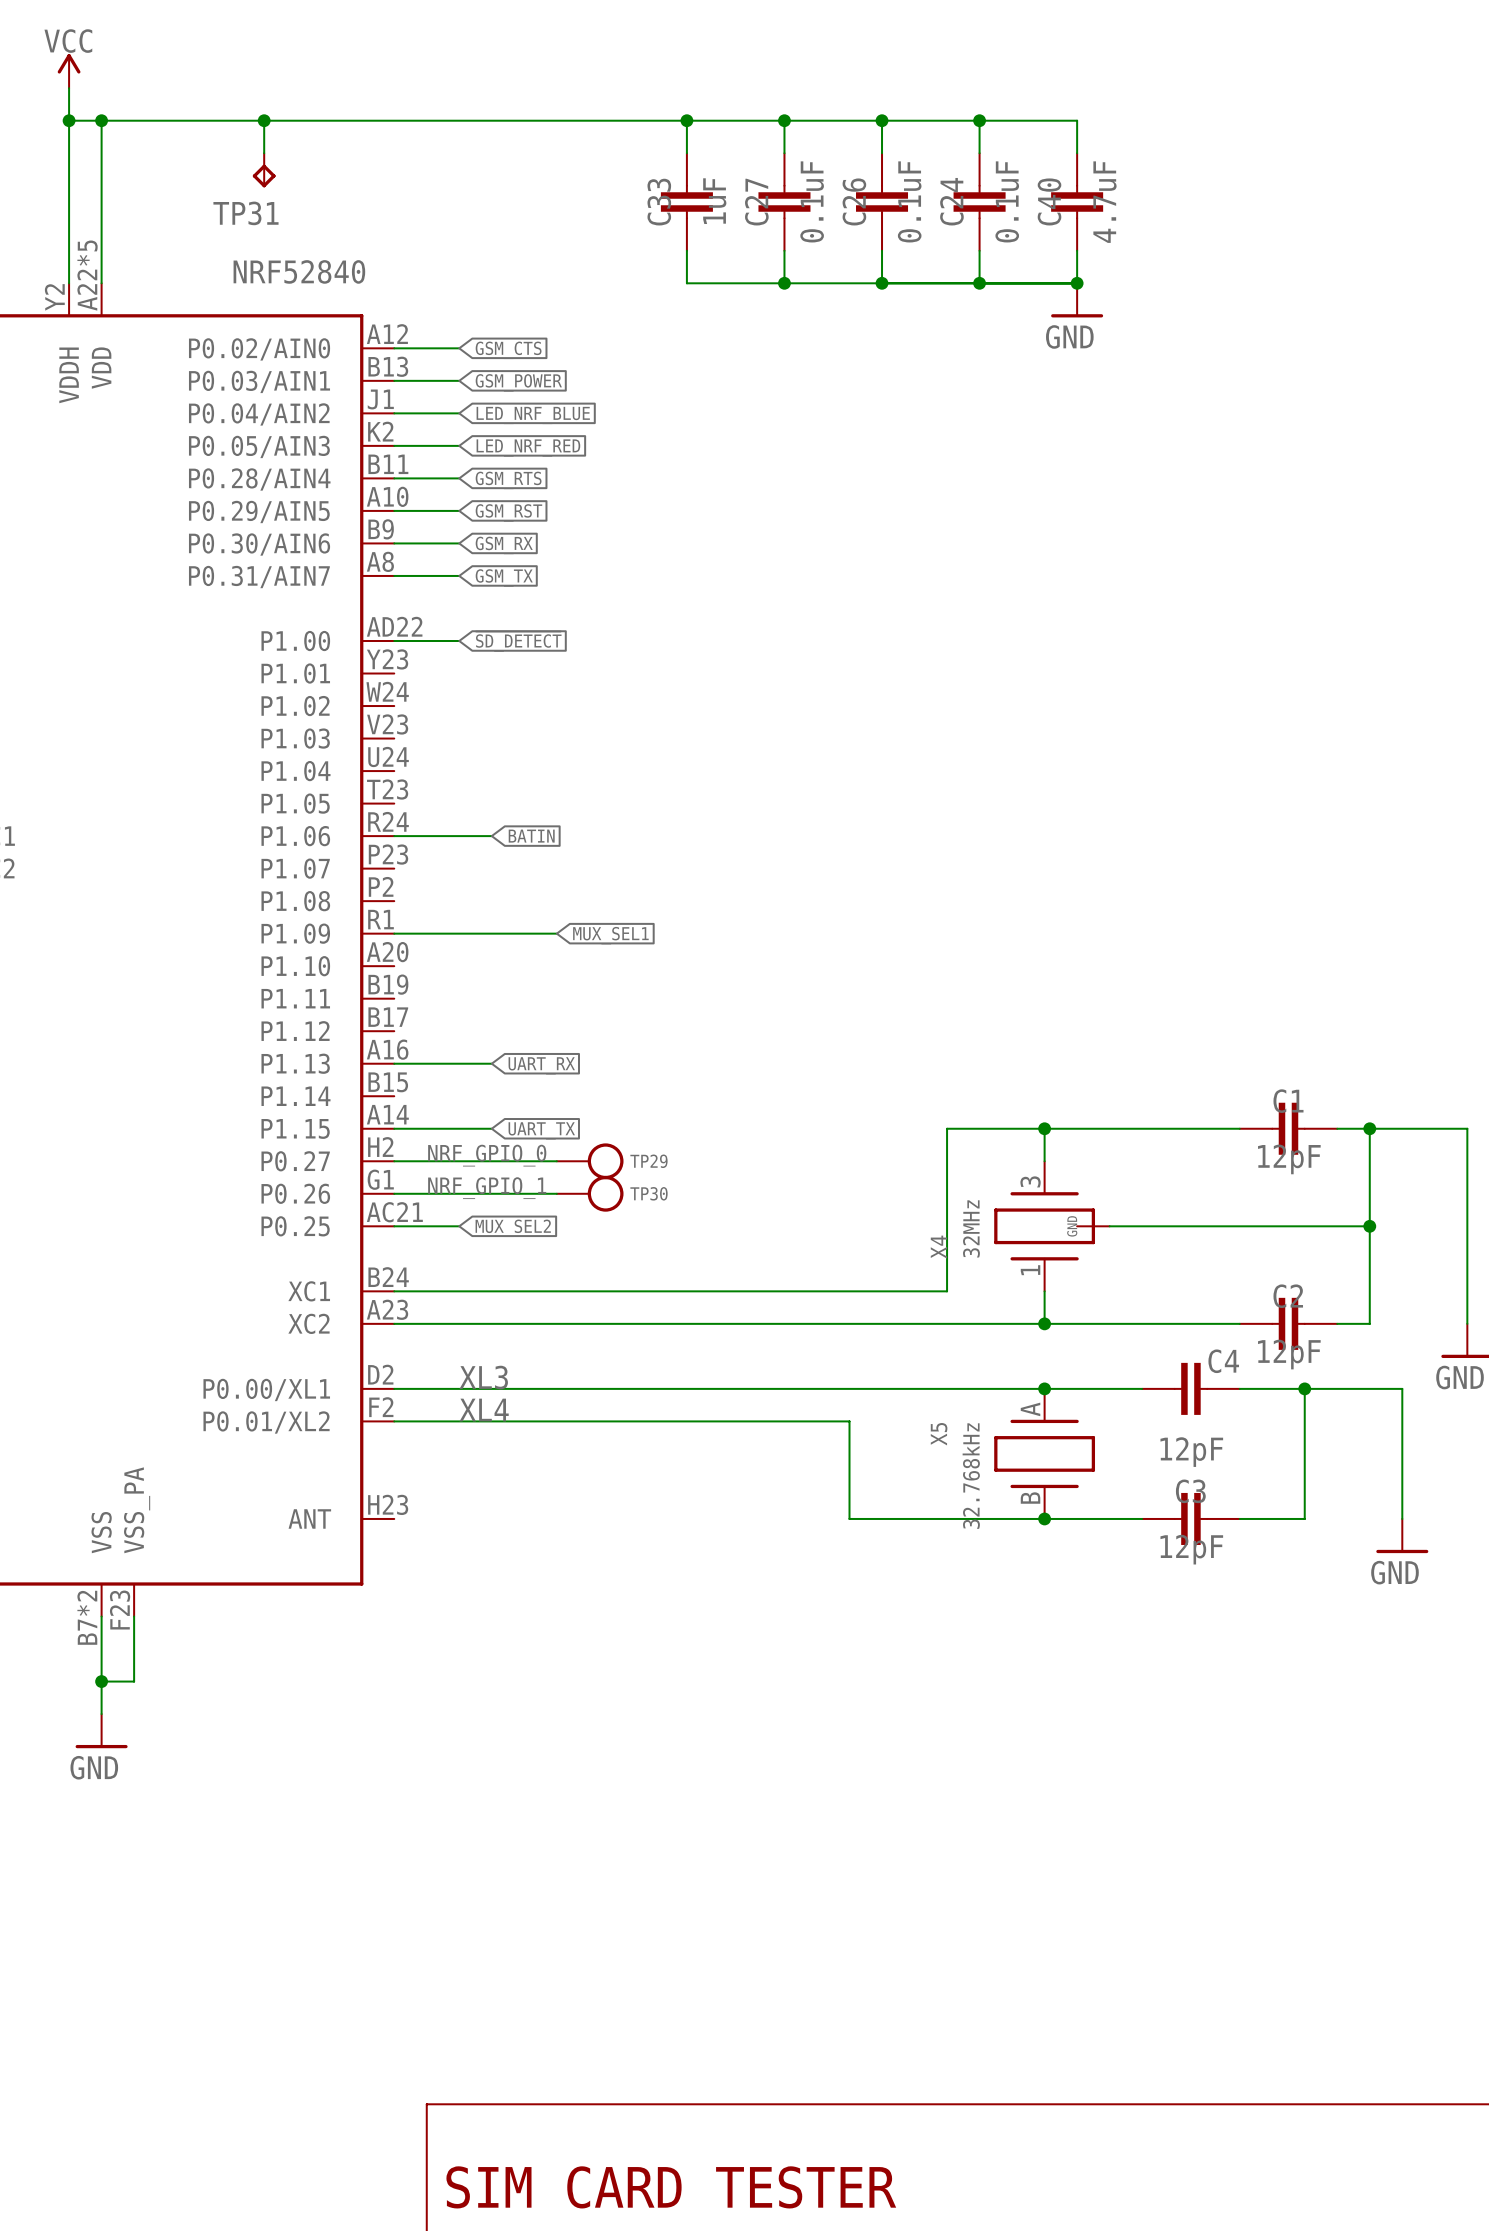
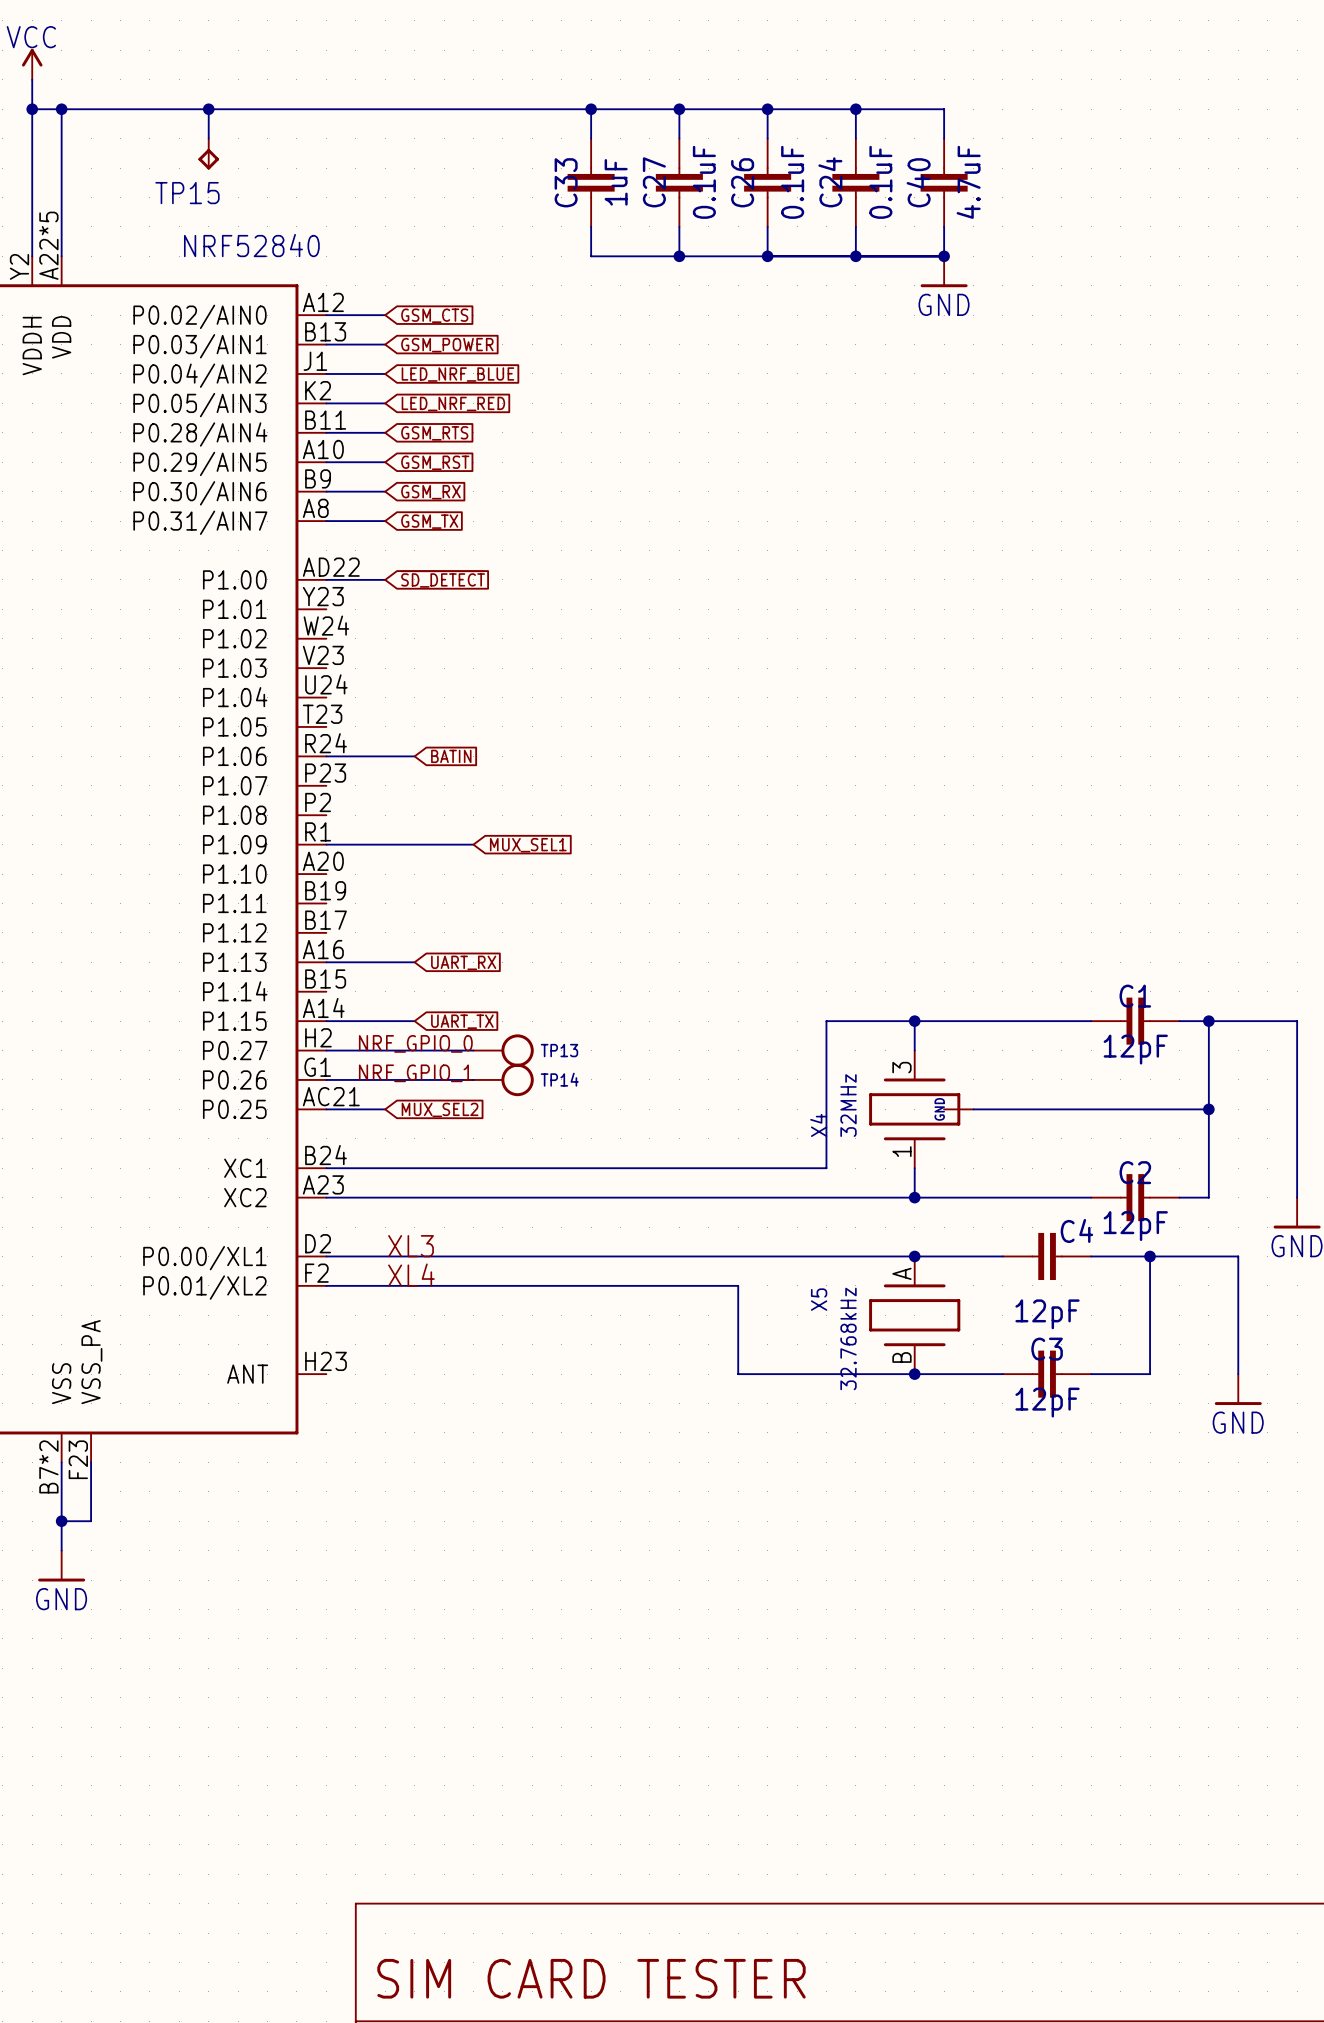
TP31 name: TP31 (245, 213) -> TP15 (187, 193)
TP29 name: TP29 (648, 1161) -> TP13 (559, 1050)
TP30 name: TP30 (649, 1193) -> TP14 (559, 1079)

